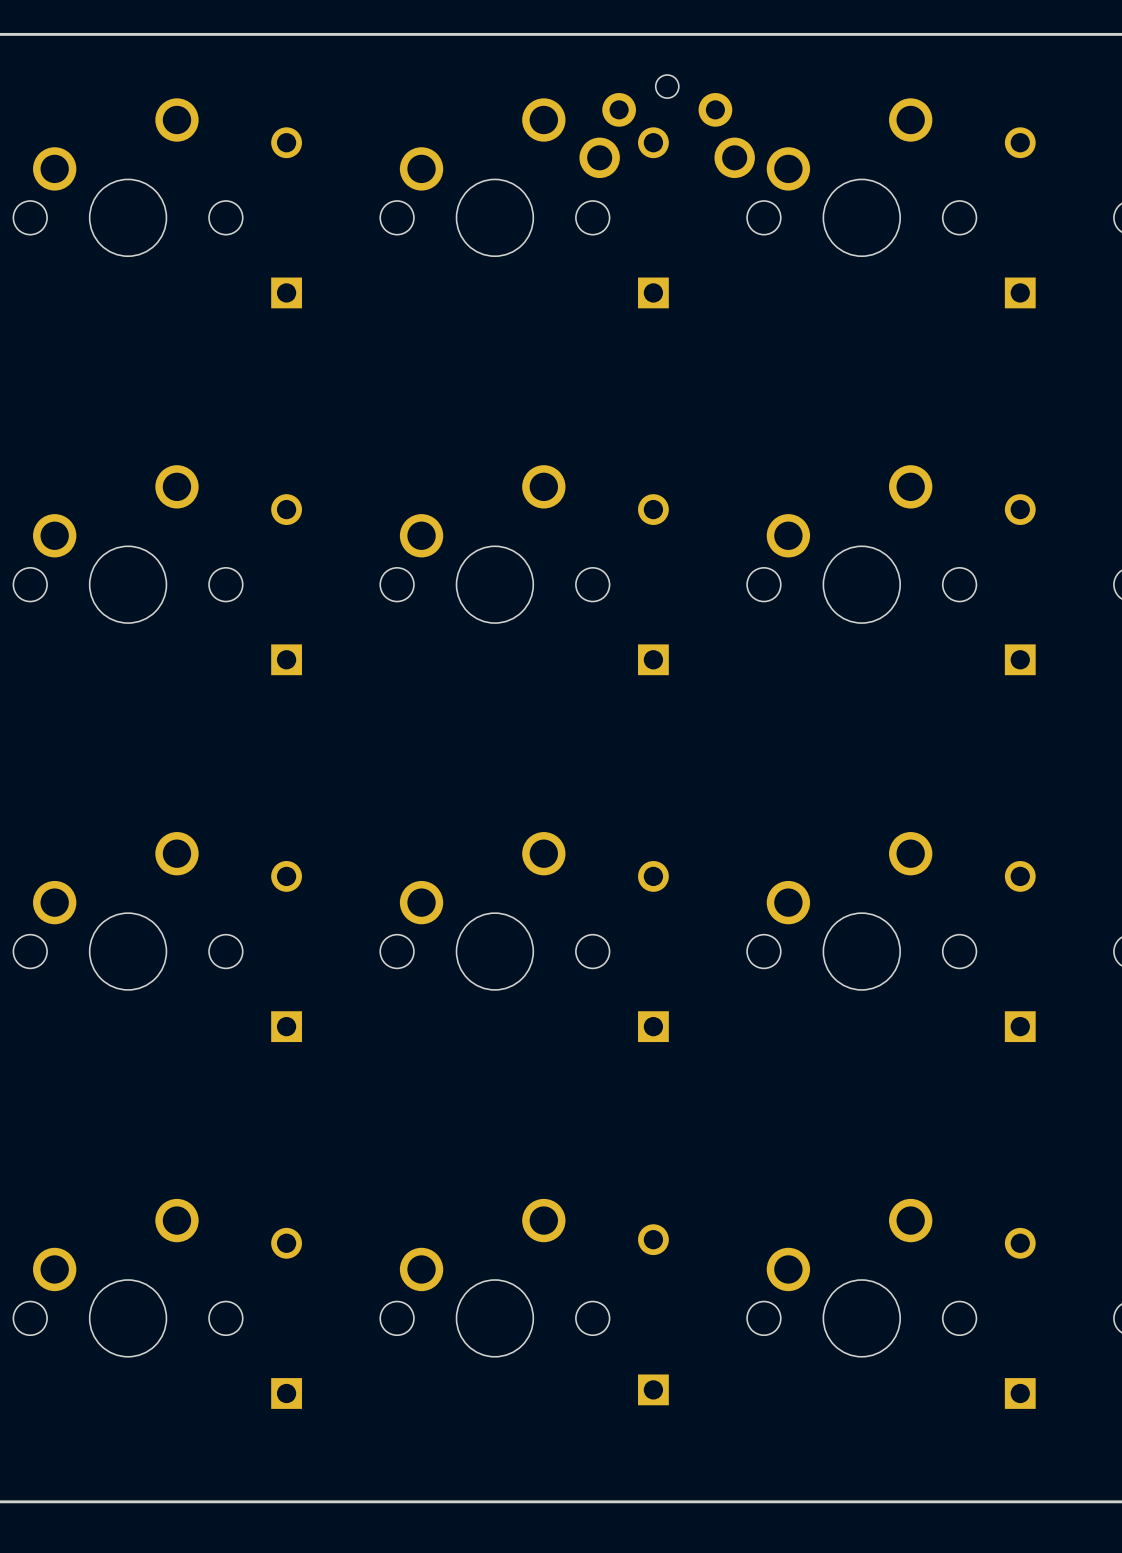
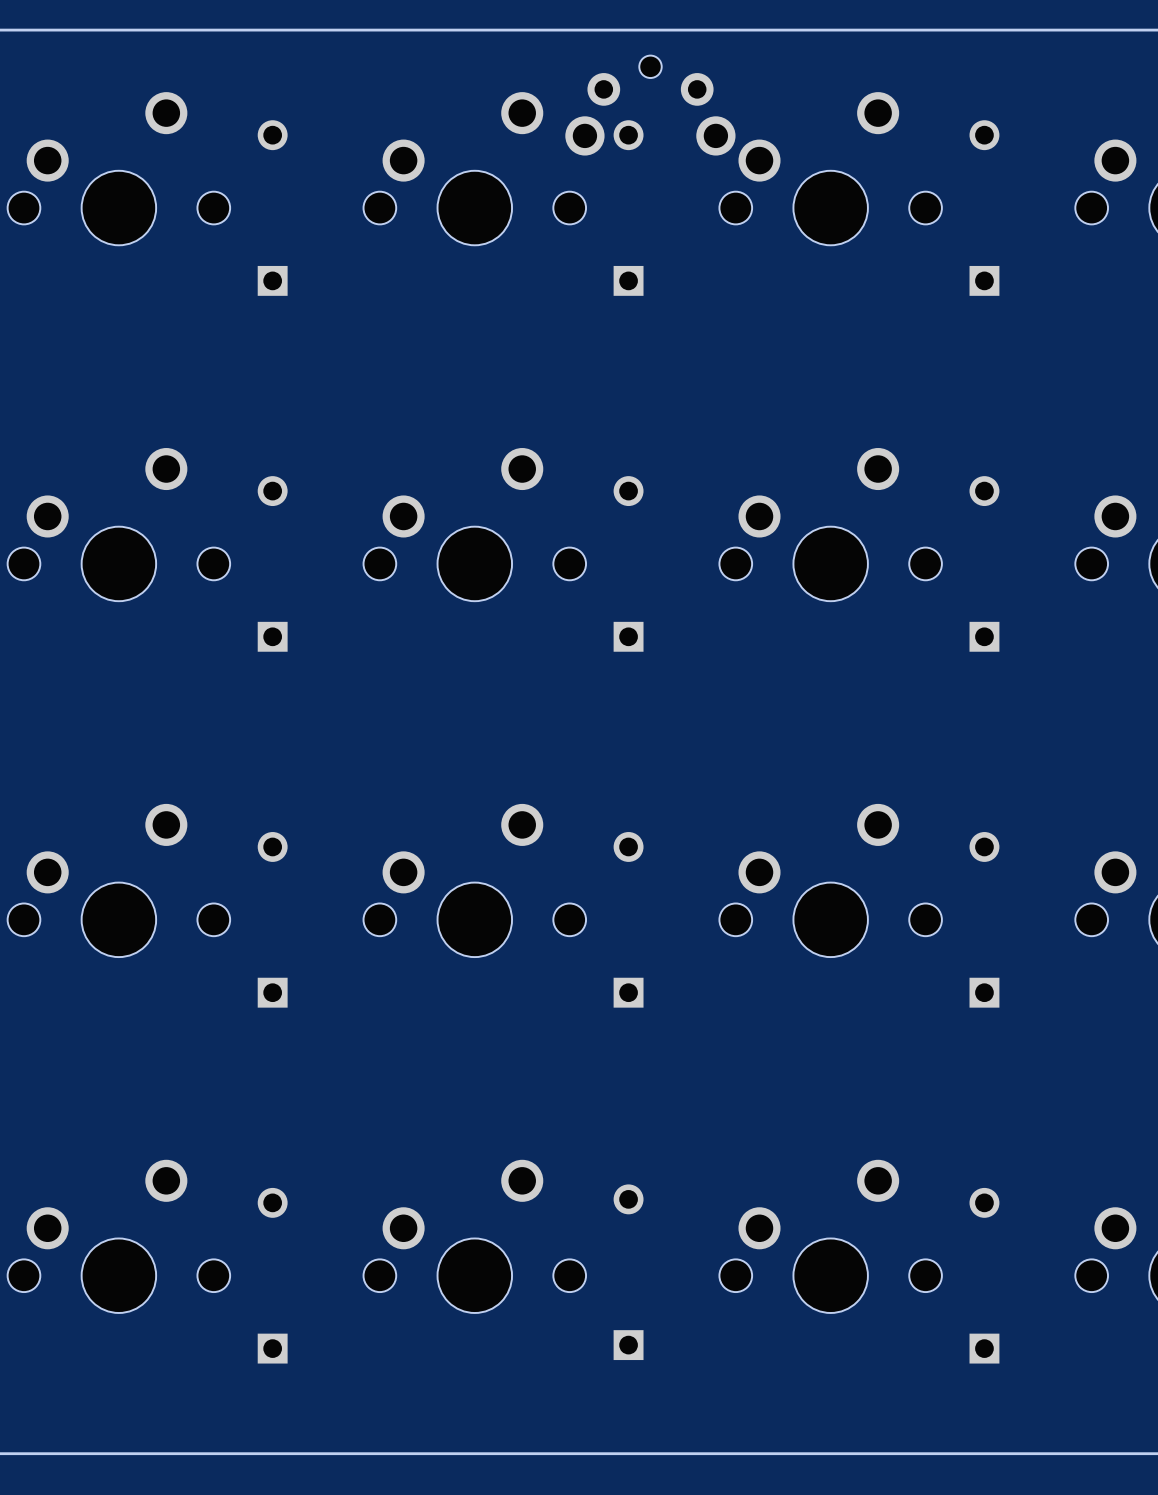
part position: (667, 126) -> (650, 105)

